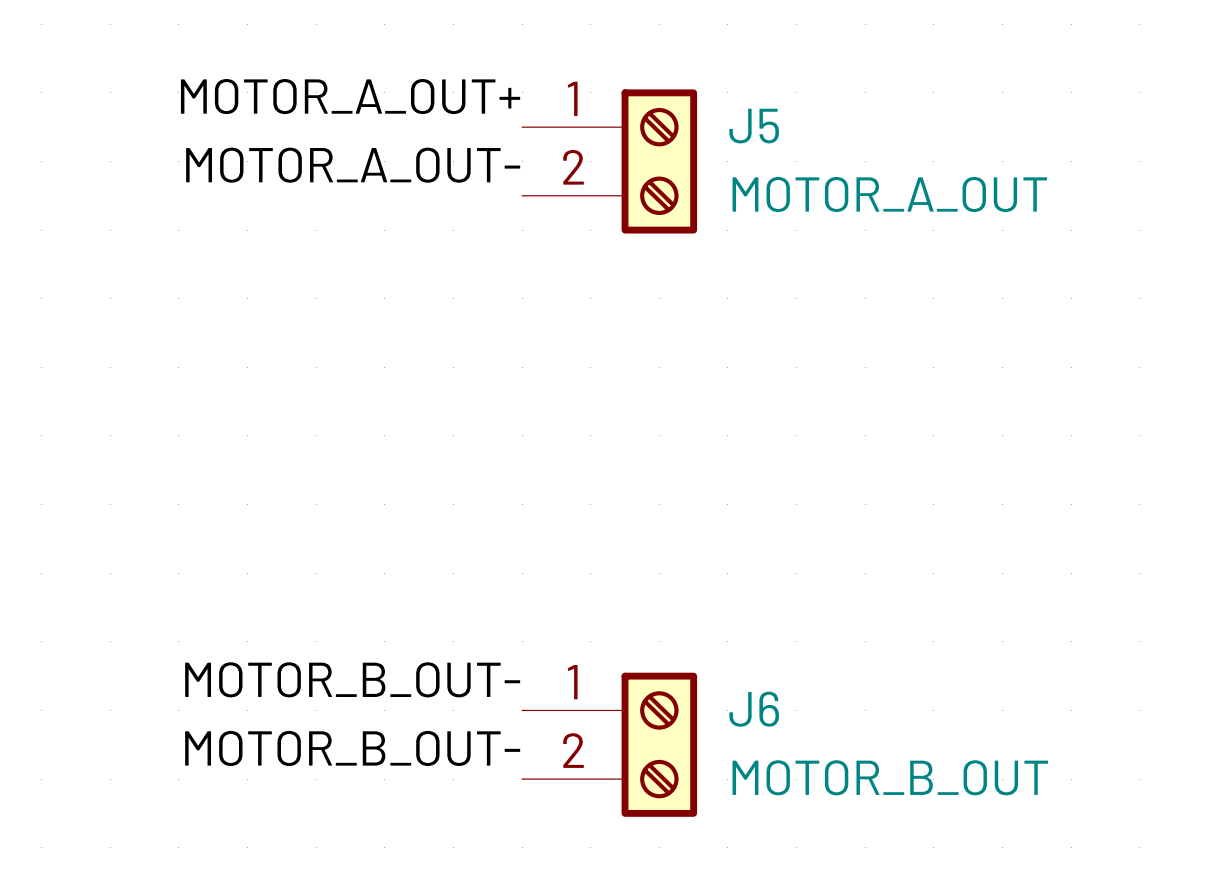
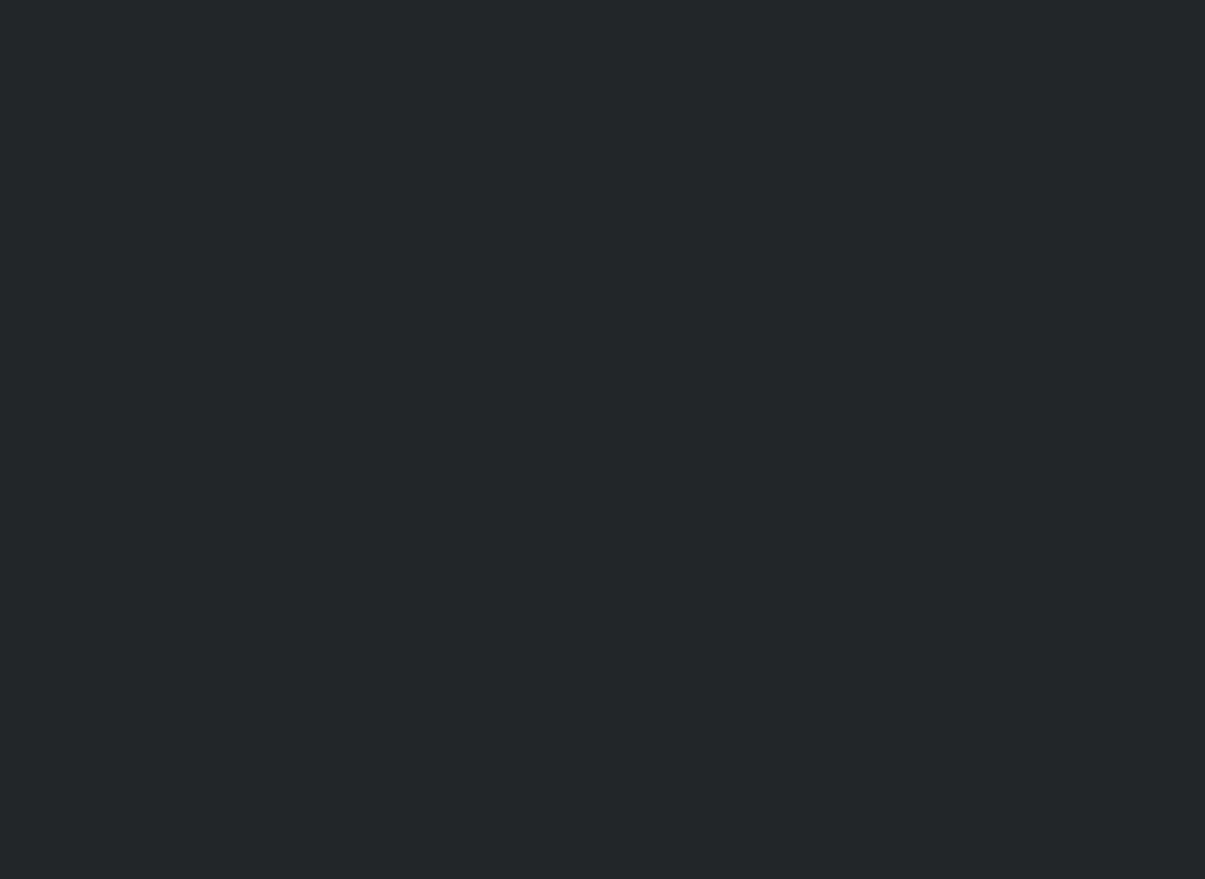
label: MOTOR_A_OUT+ (350, 96) -> none
J5: MOTOR_A_OUT (609, 161) -> none
label: MOTOR_A_OUT- (353, 165) -> none
label: MOTOR_B_OUT- (352, 679) -> none
J6: MOTOR_B_OUT (609, 744) -> none
label: MOTOR_B_OUT- (352, 748) -> none

